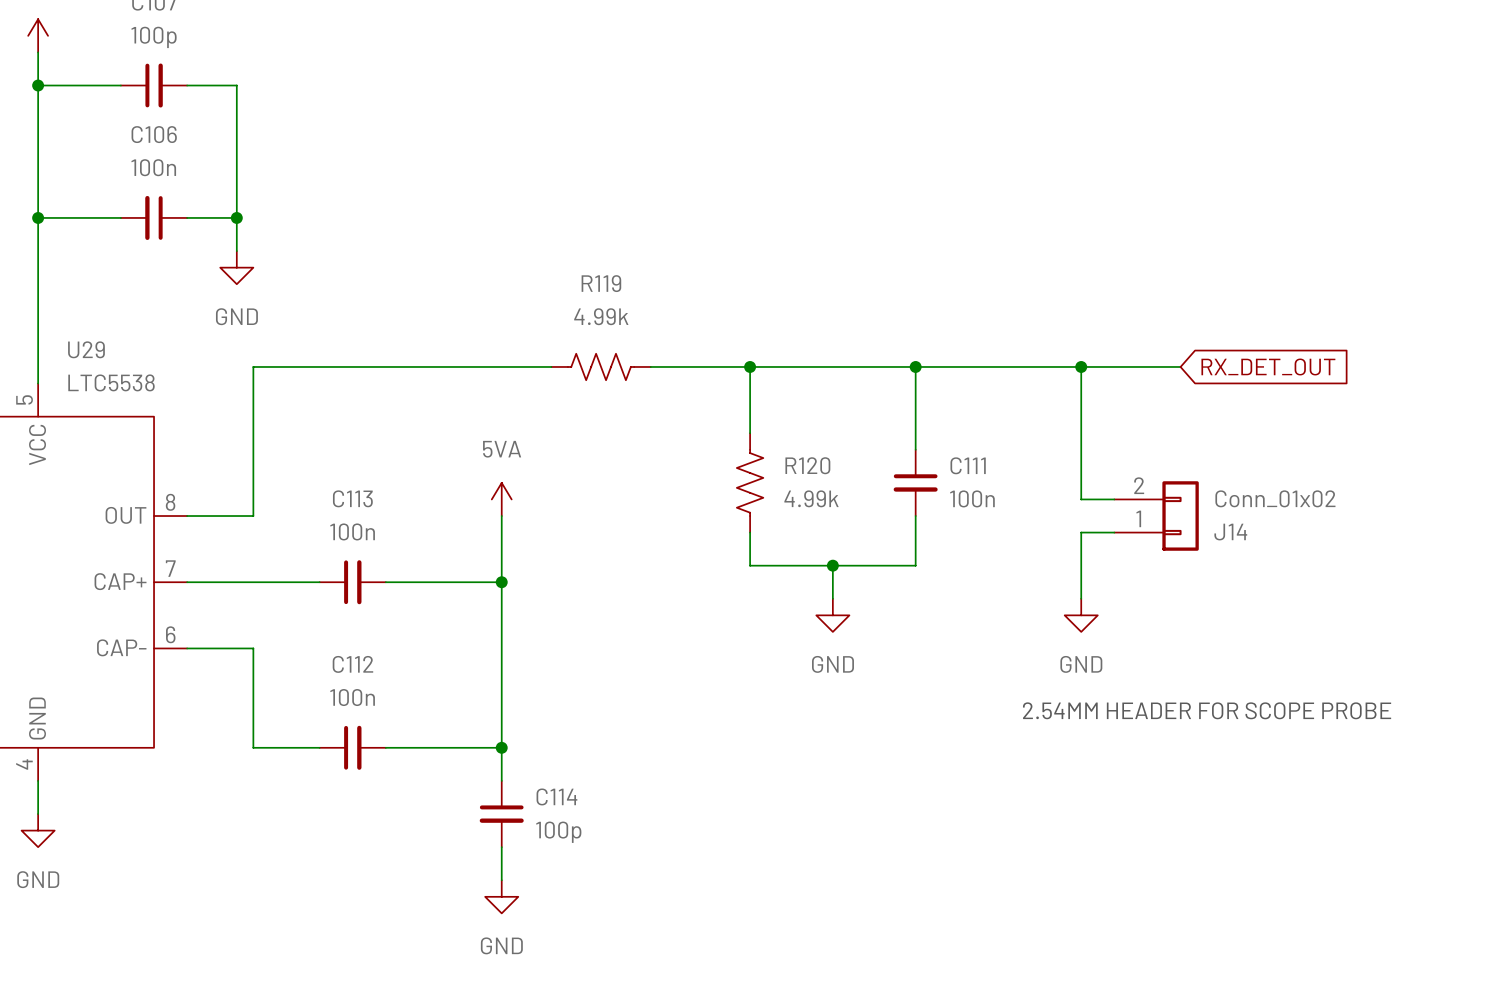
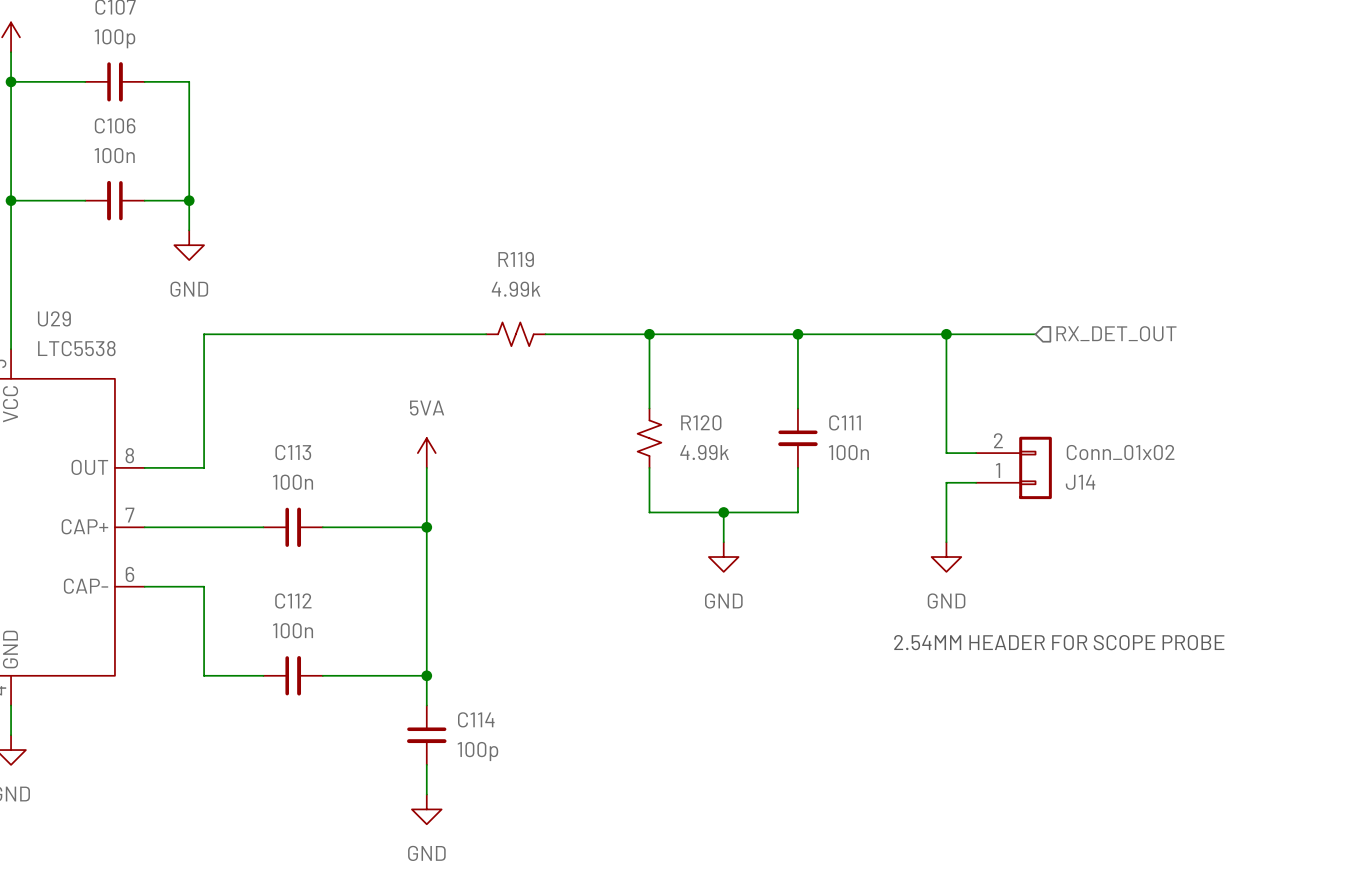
R119 symbol: [551, 353, 651, 381] -> [486, 322, 546, 347]
global label: RX_DET_OUT (1268, 366) -> none
hierarchical label: none -> RX_DET_OUT (1116, 333)
R120 symbol: [736, 433, 764, 533] -> [637, 408, 662, 468]

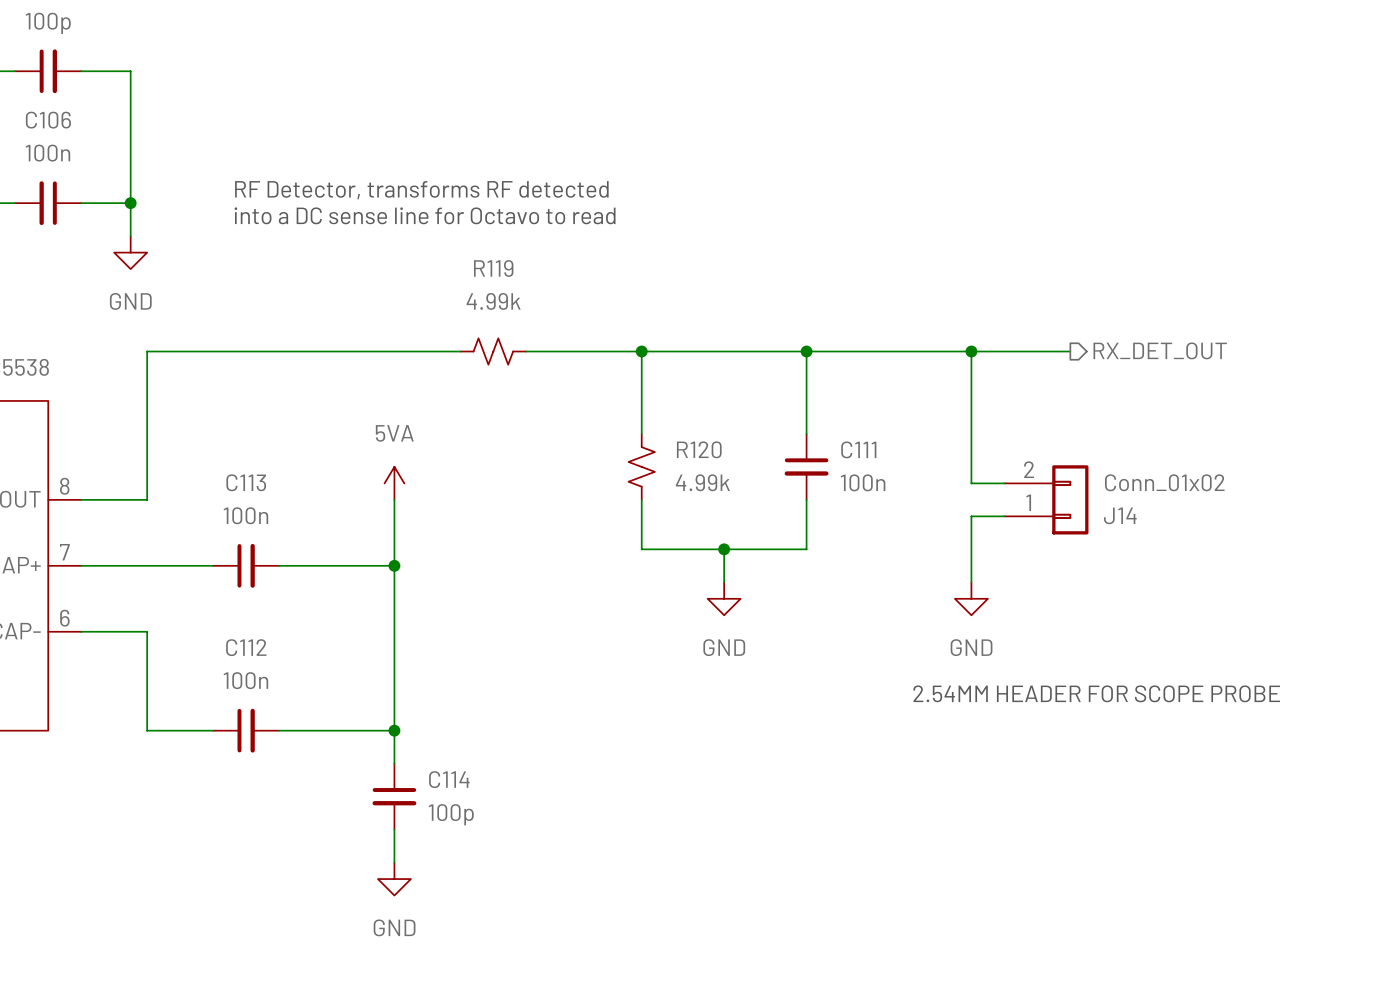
text: none -> RF Detector, transforms RF detected (421, 190)
text: none -> into a DC sense line for Octavo to read (425, 215)
hierarchical label shape: input (1116, 333) -> output (1160, 350)

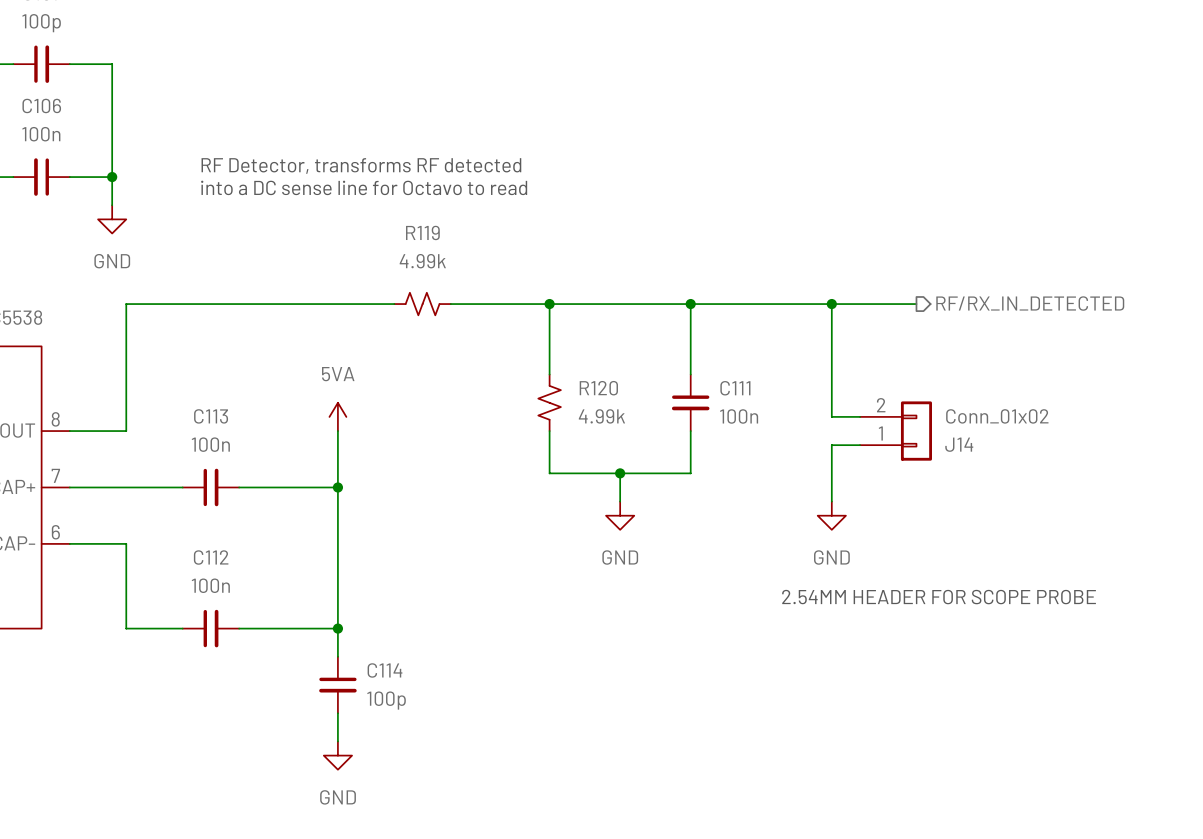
hierarchical label: RX_DET_OUT (1160, 350) -> RF/RX_IN_DETECTED (1030, 303)

